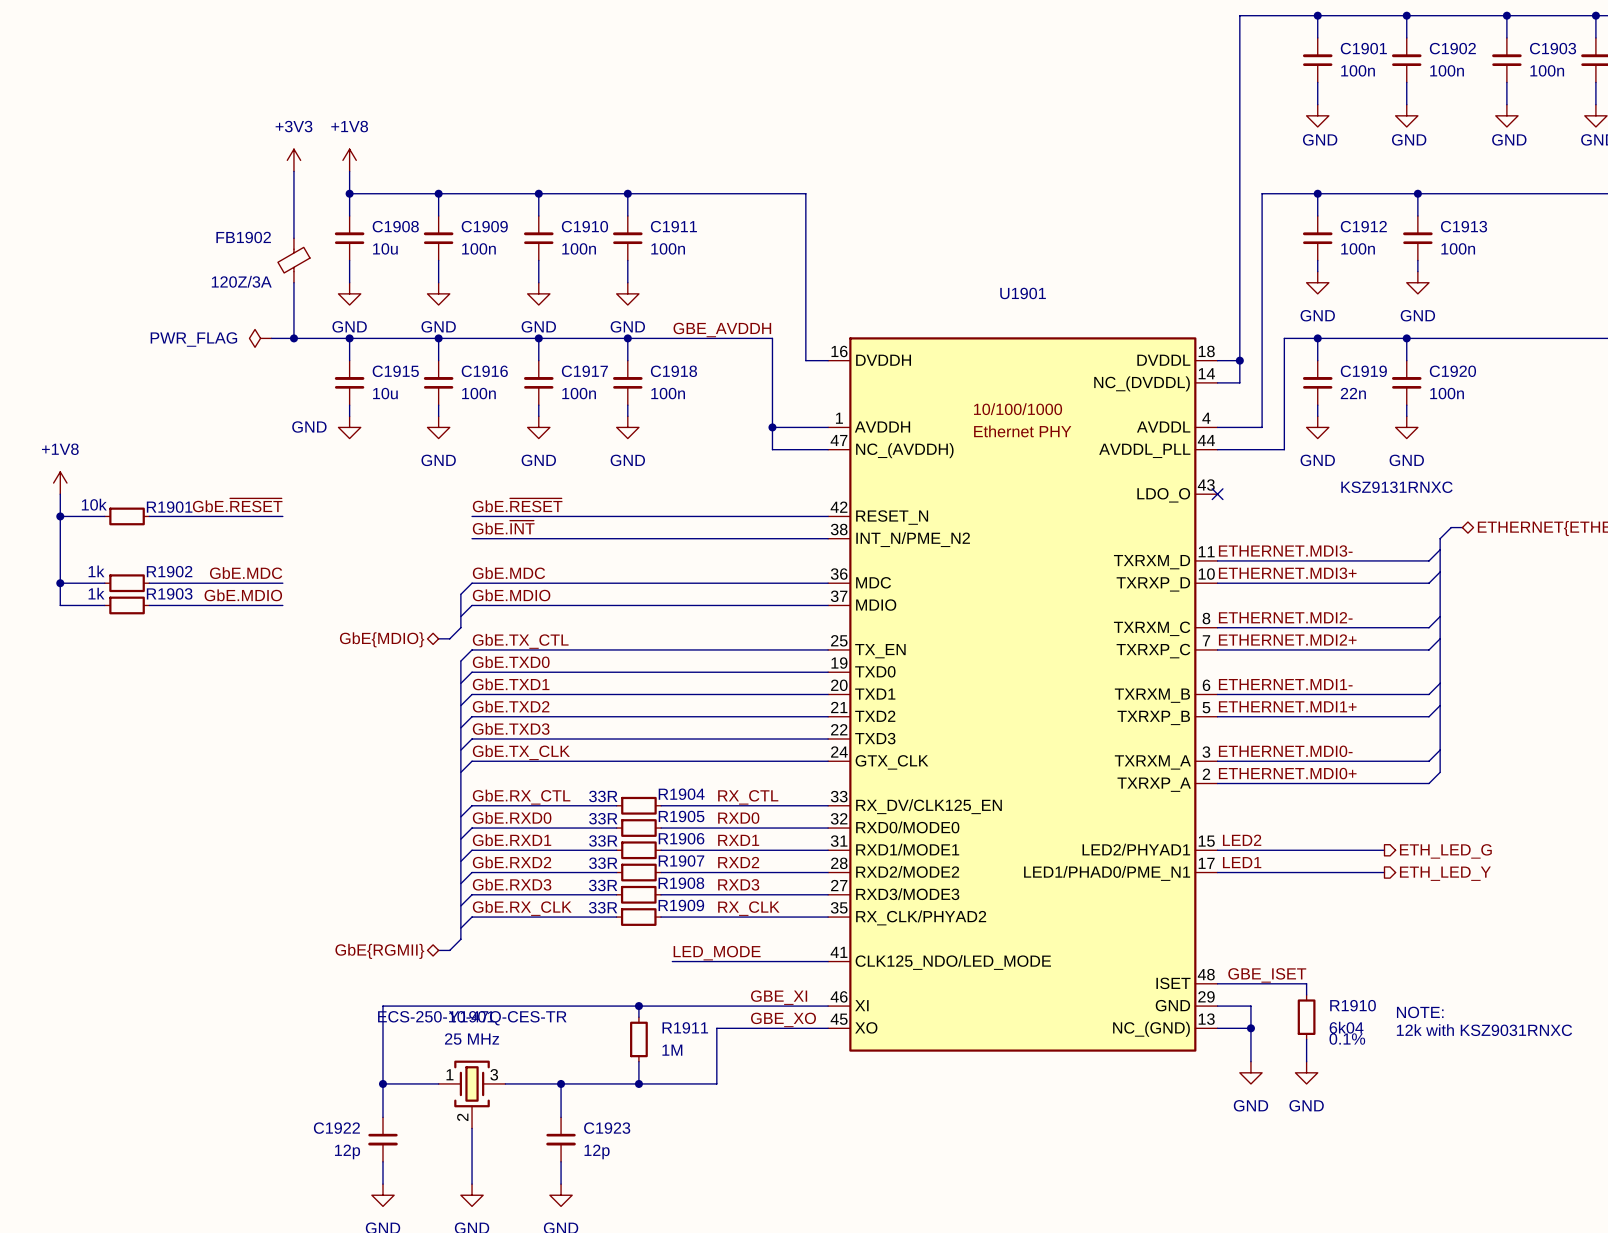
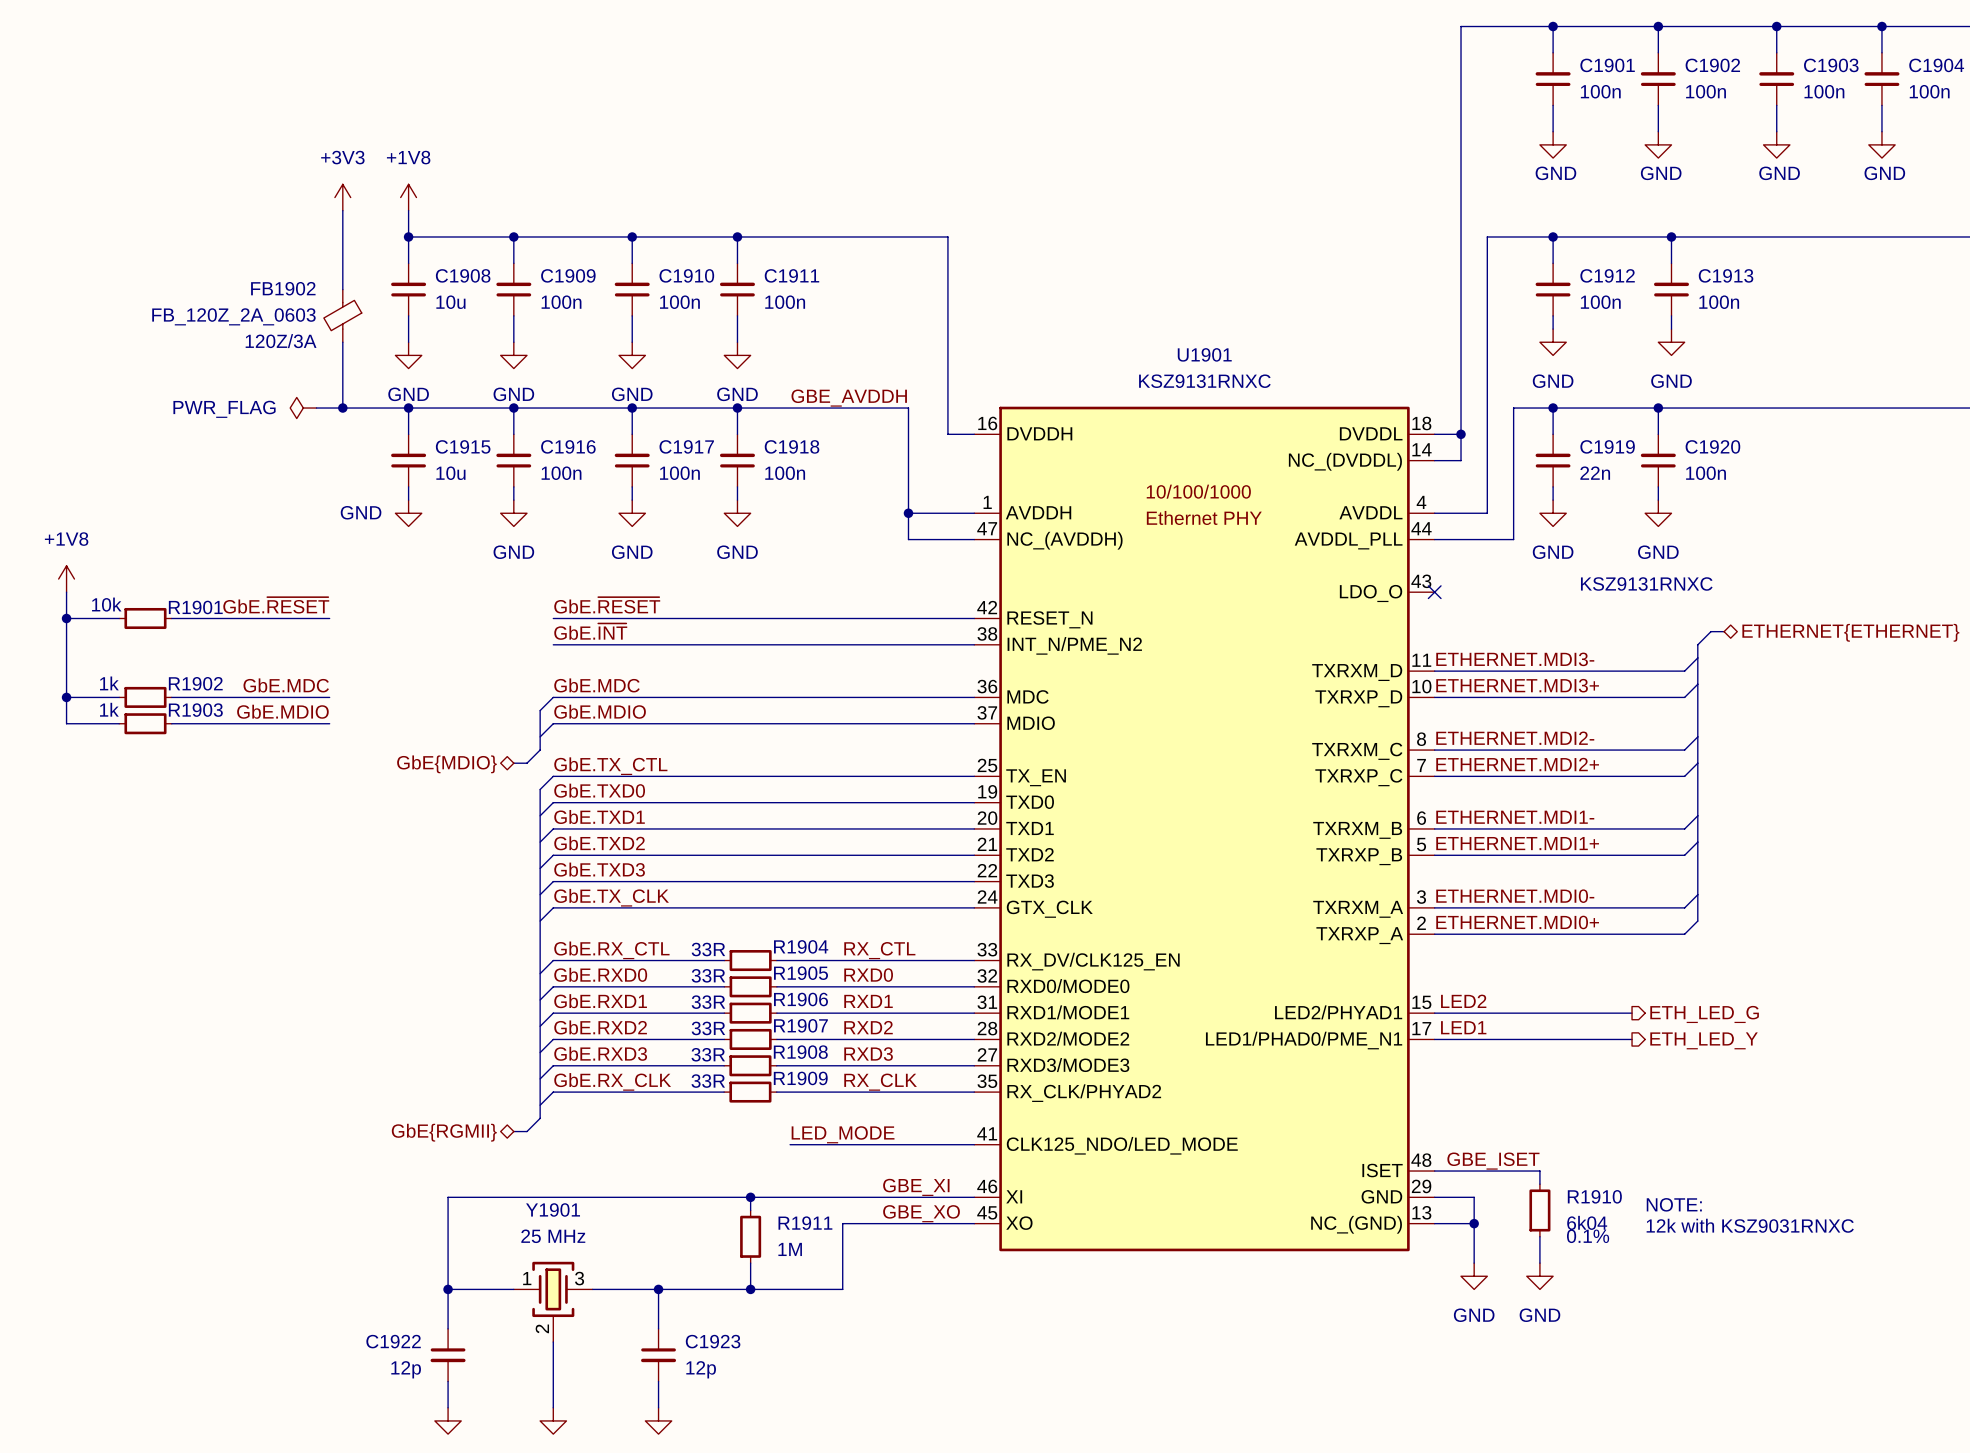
FB1902 value: none -> FB_120Z_2A_0603 (233, 316)
U1901 value: none -> KSZ9131RNXC (1204, 381)
Y1901 text: ECS-250-10-47Q-CES-TR (472, 1018) -> none

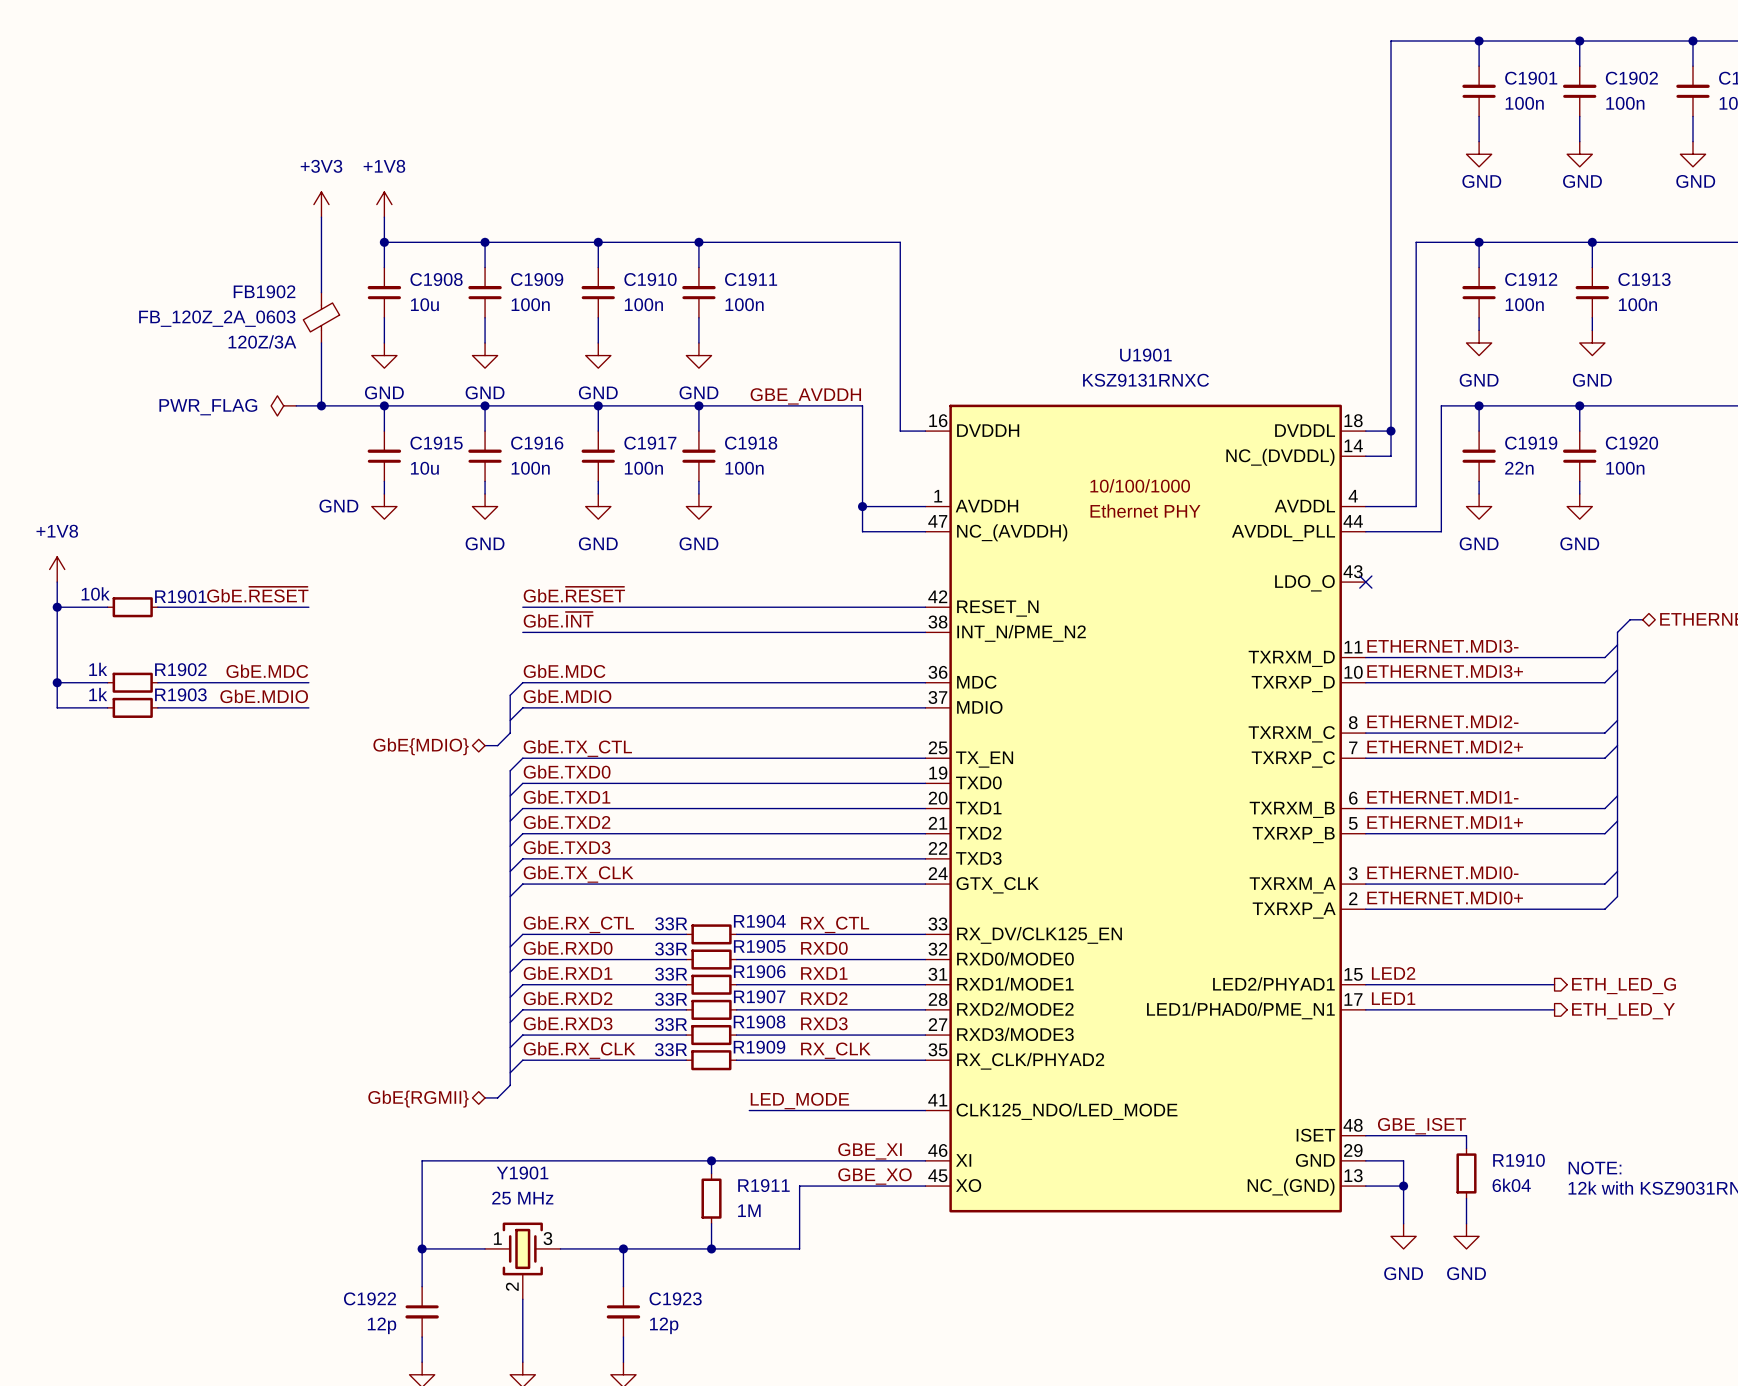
U1901 text: KSZ9131RNXC (1646, 583) -> none
R1910 text: 0.1% (1588, 1236) -> none

